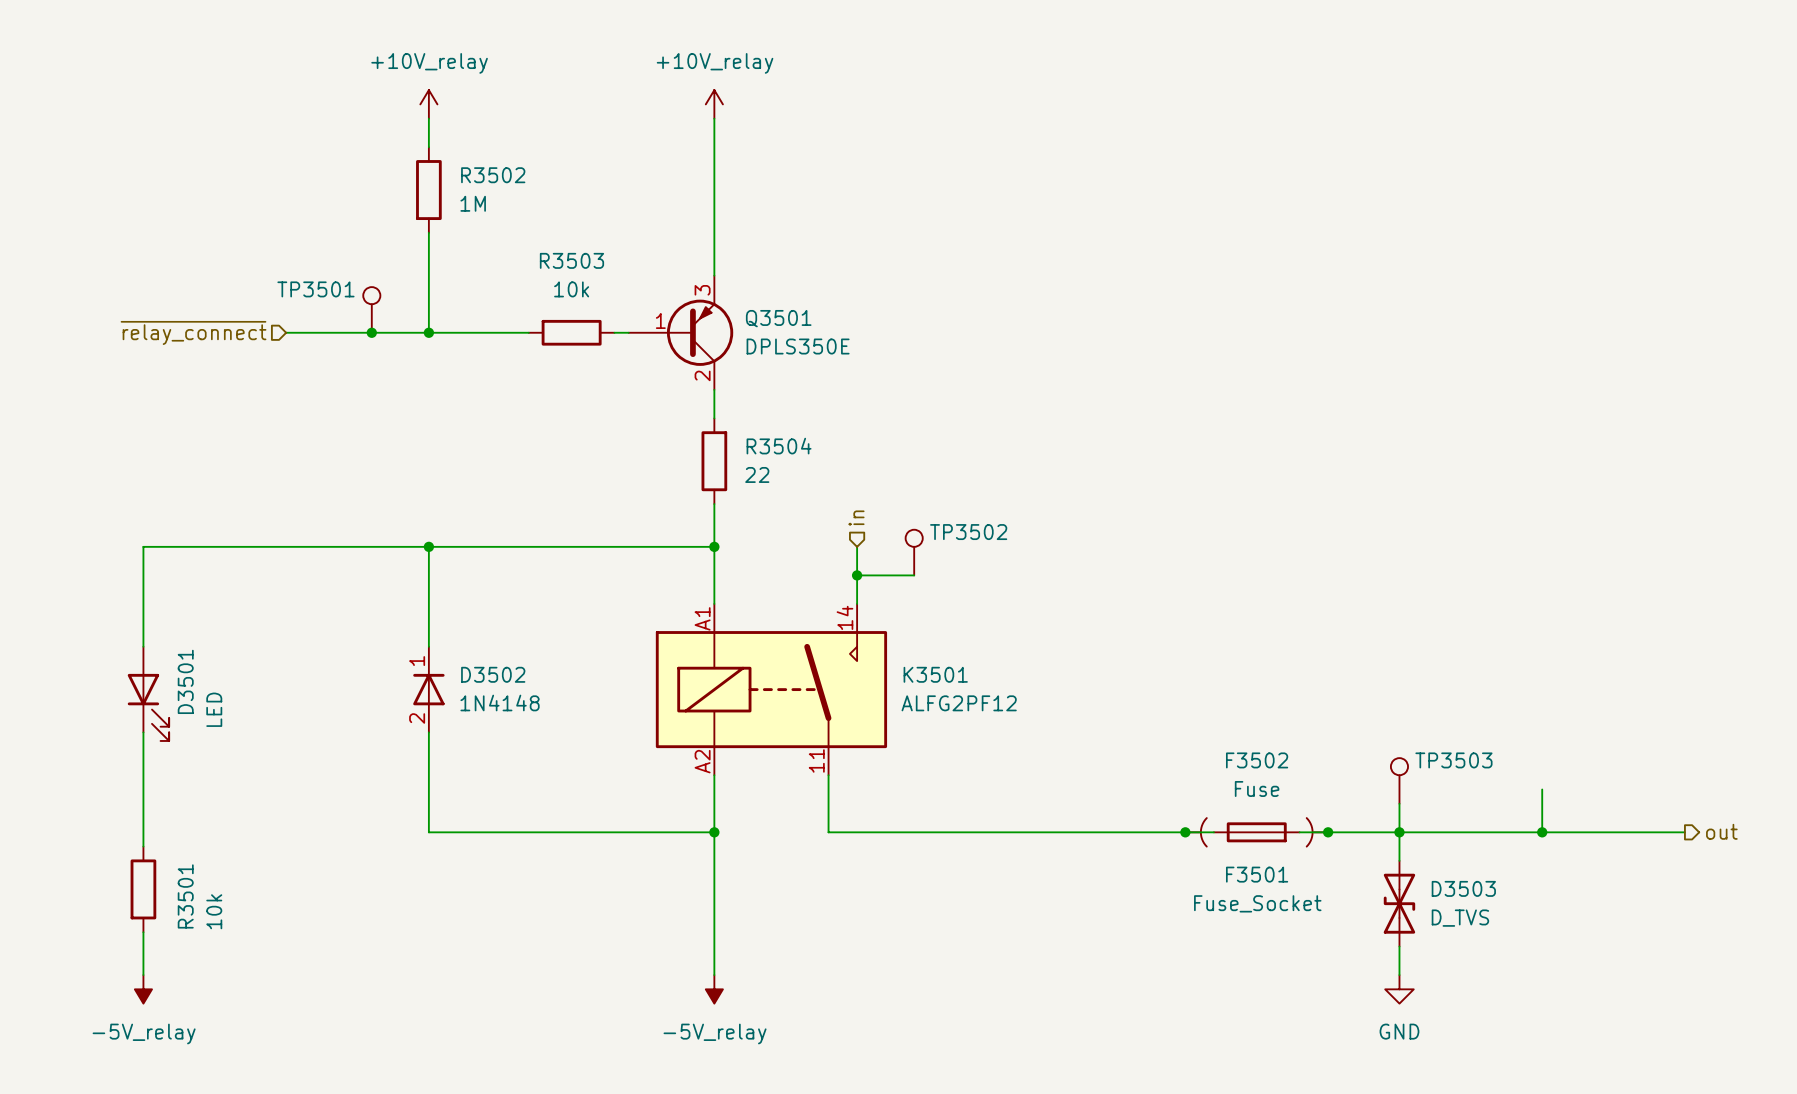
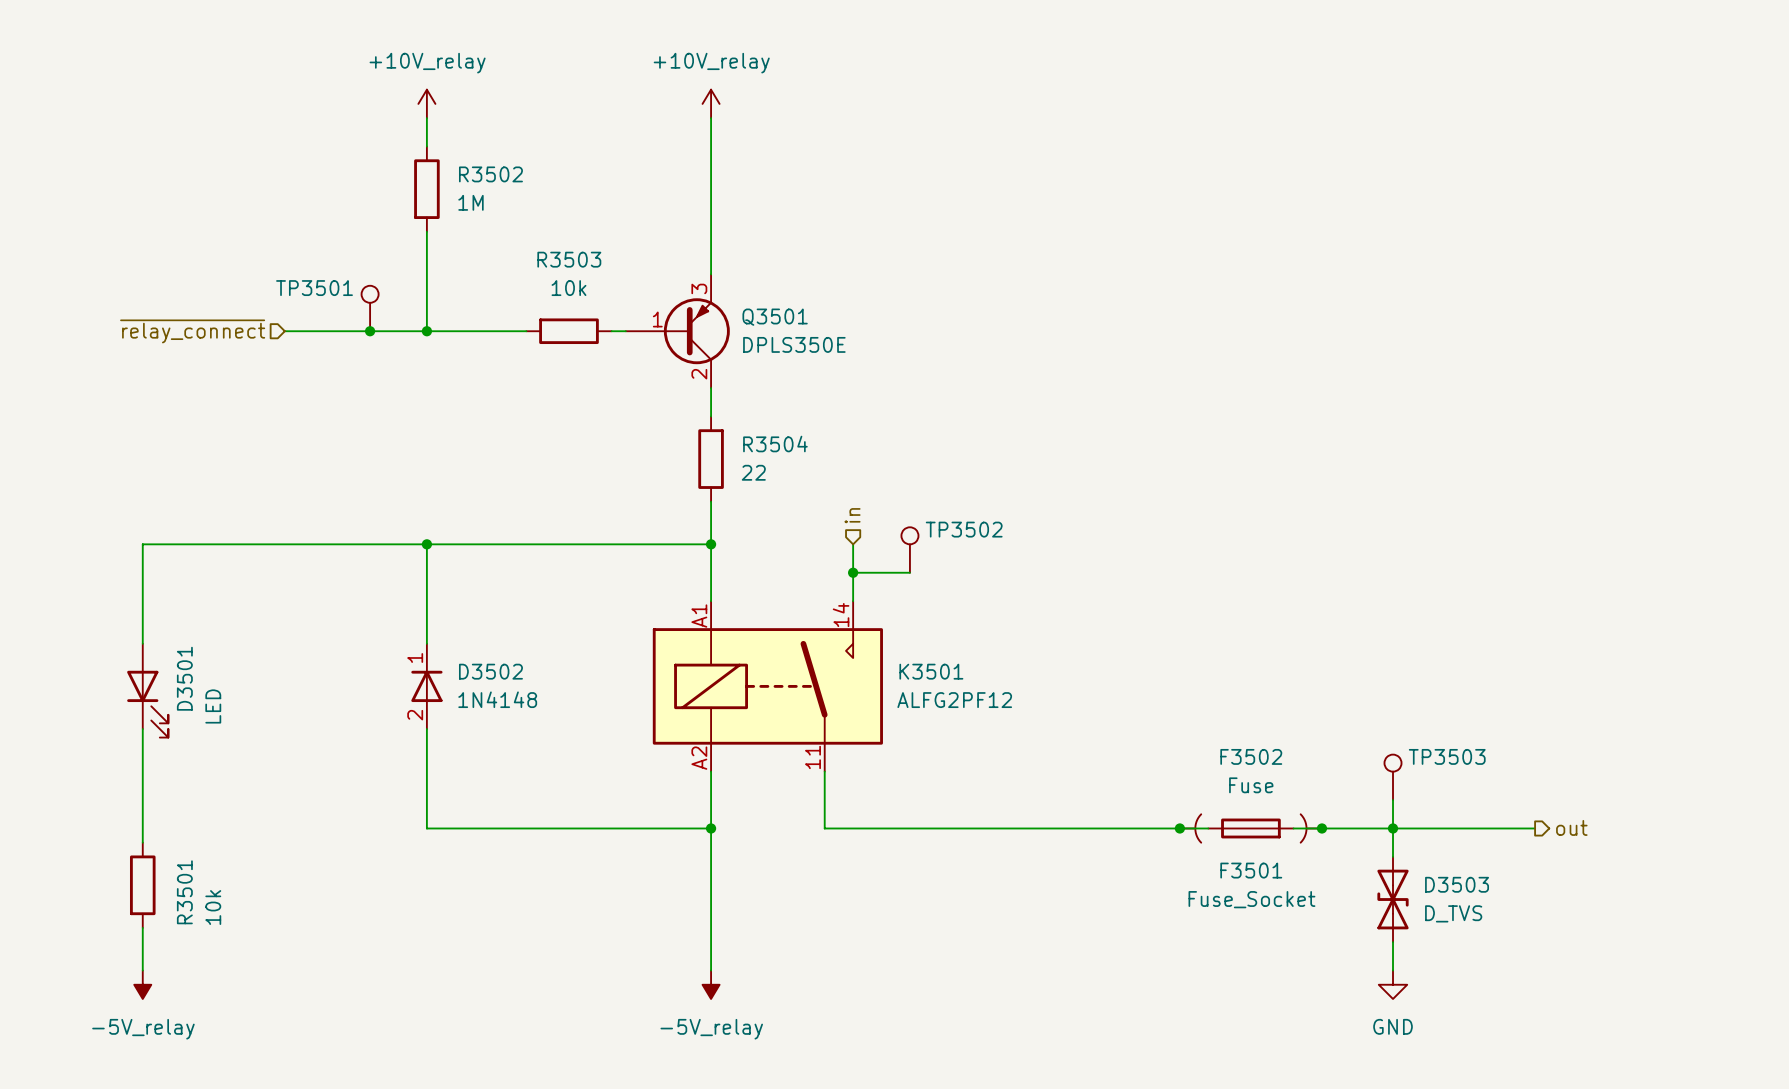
wire: (1542, 789) (1542, 832) (1684, 832) -> none
hierarchical label position: out (1721, 831) -> out (1571, 827)
junction: (1542, 832) -> none

